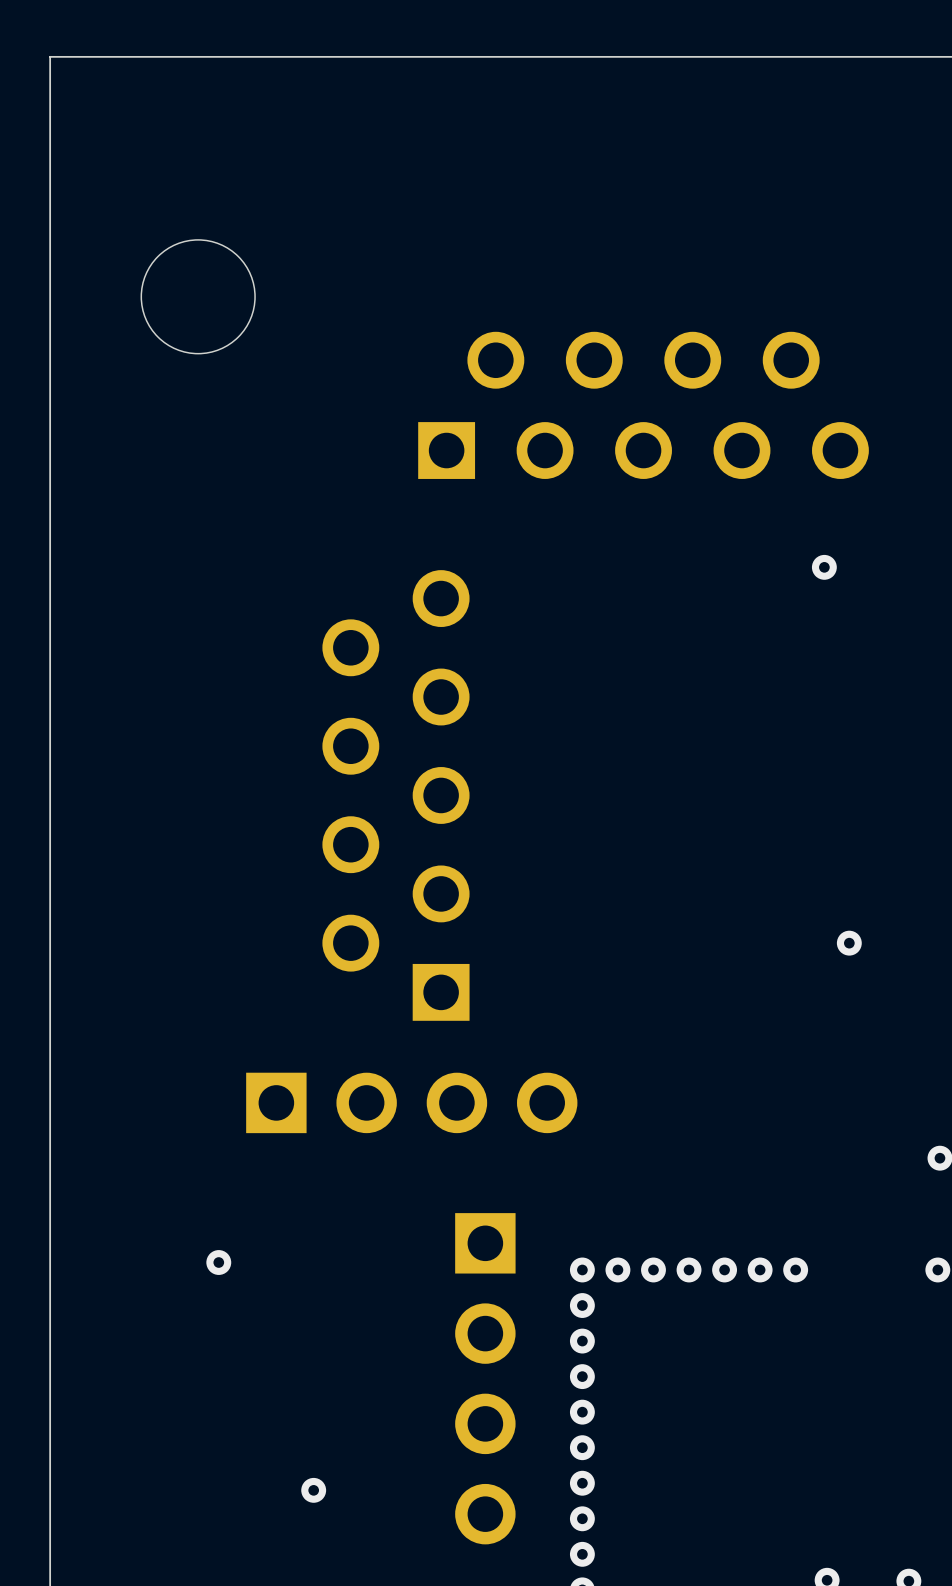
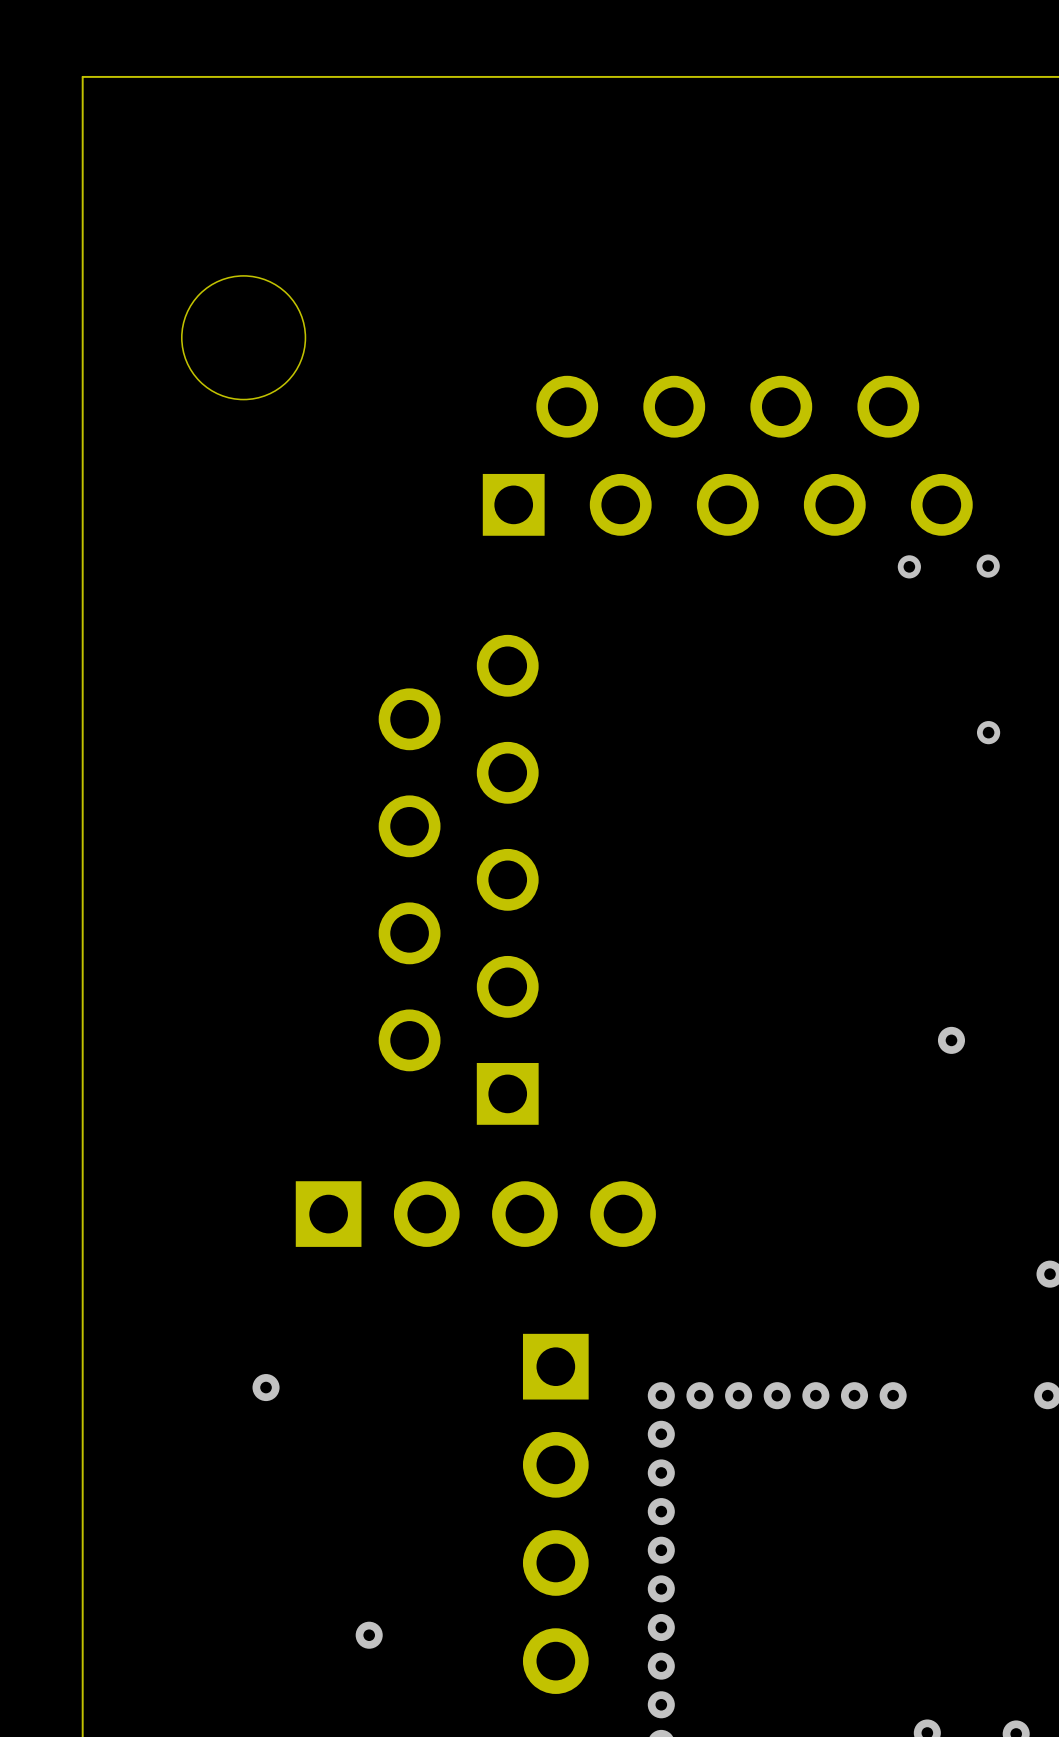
via: none -> (988, 566)
via: none -> (909, 566)
via: (824, 567) -> none
via: none -> (988, 732)

